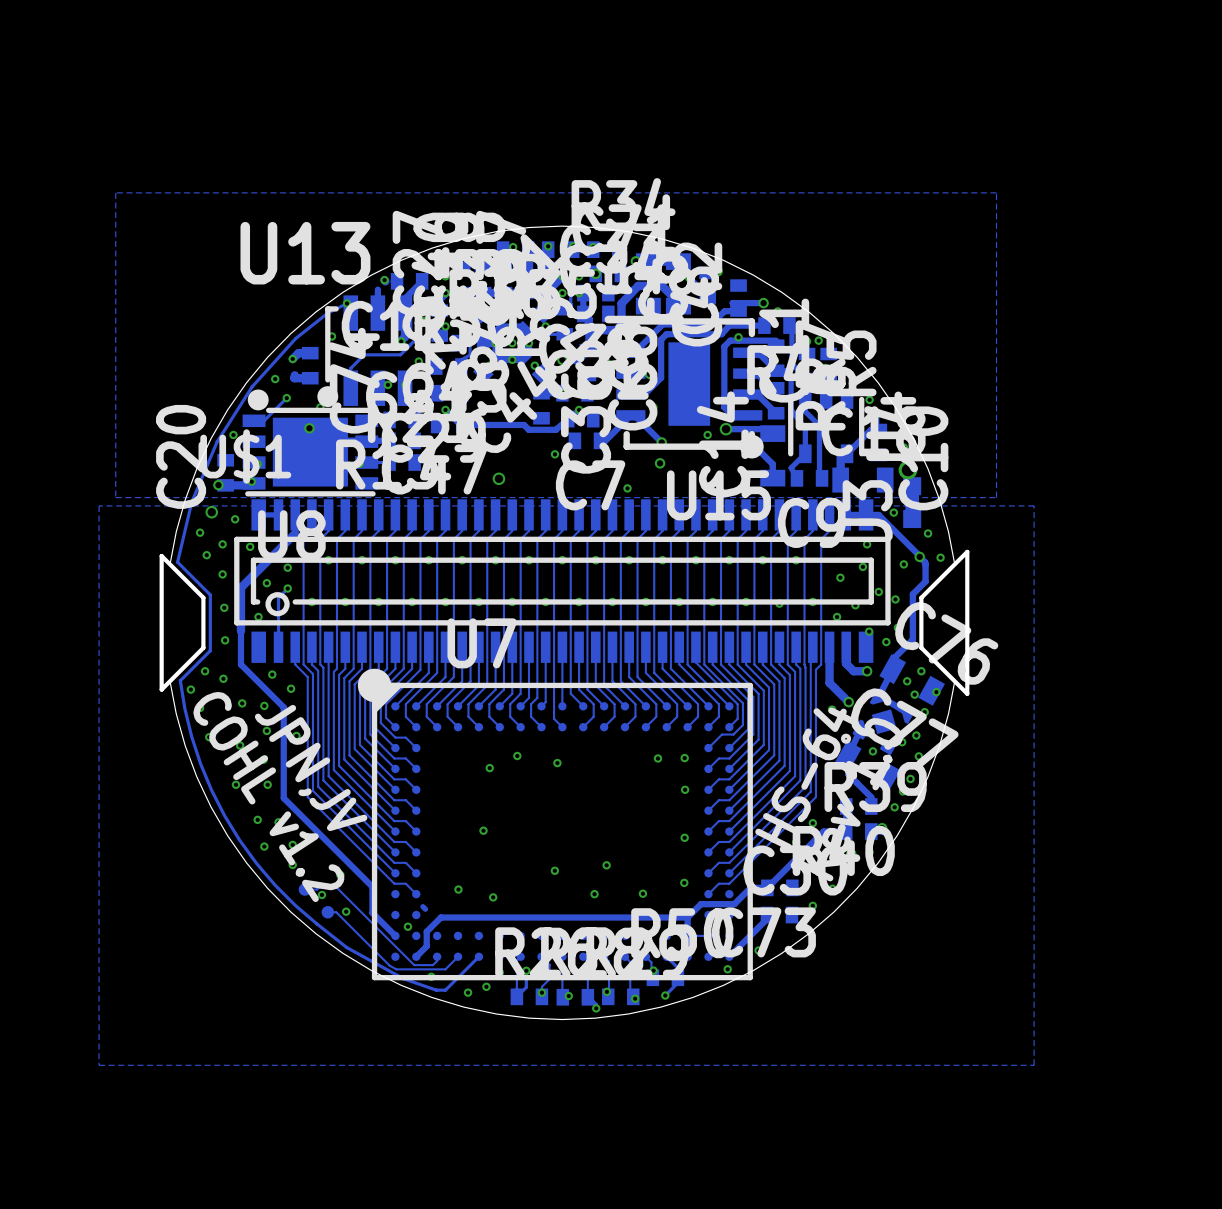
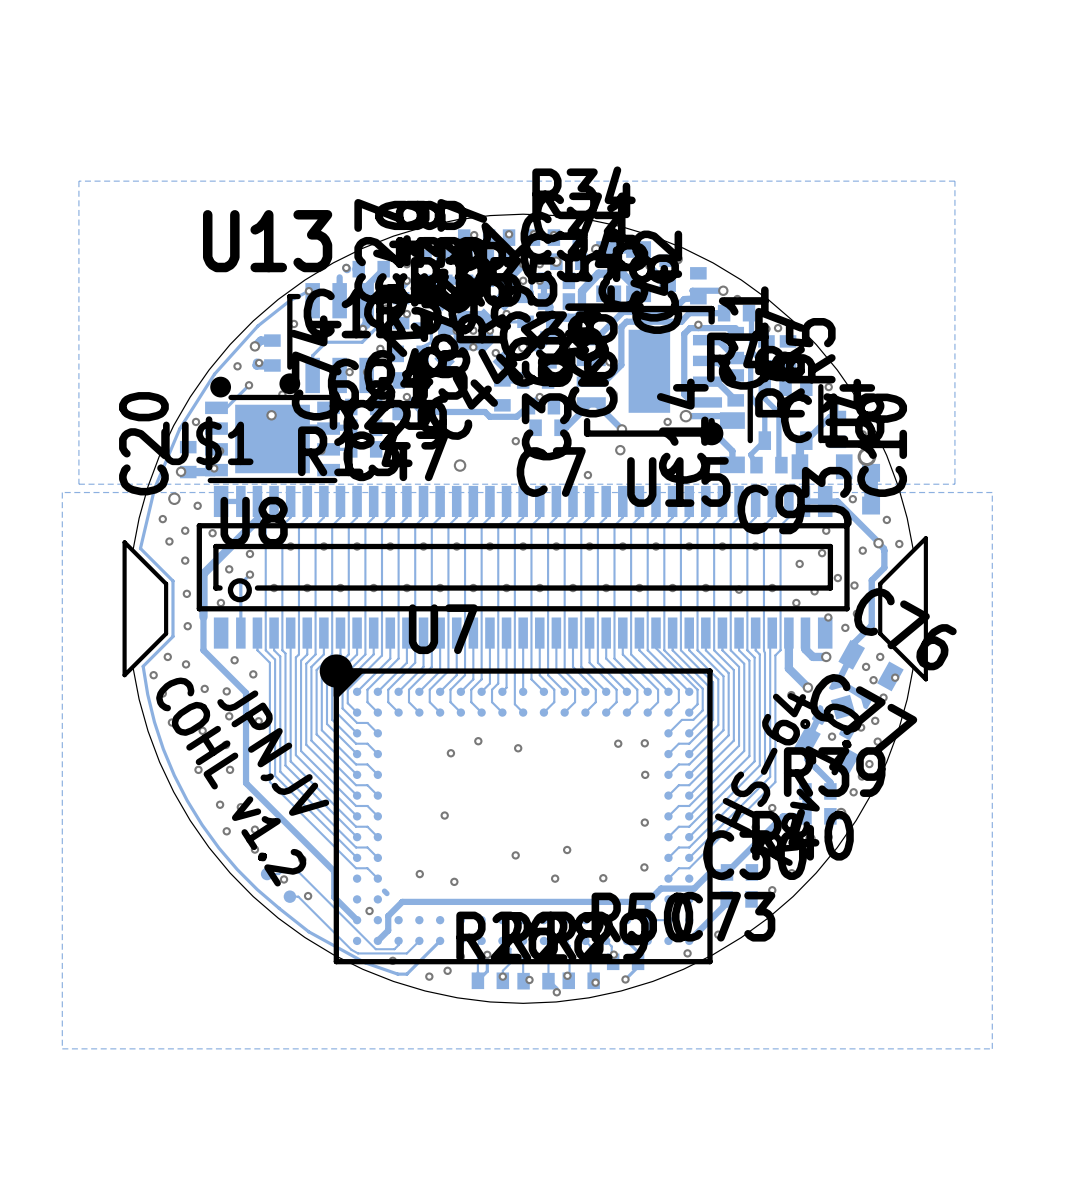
via position: (292, 359) -> (259, 362)
via: none -> (254, 346)

